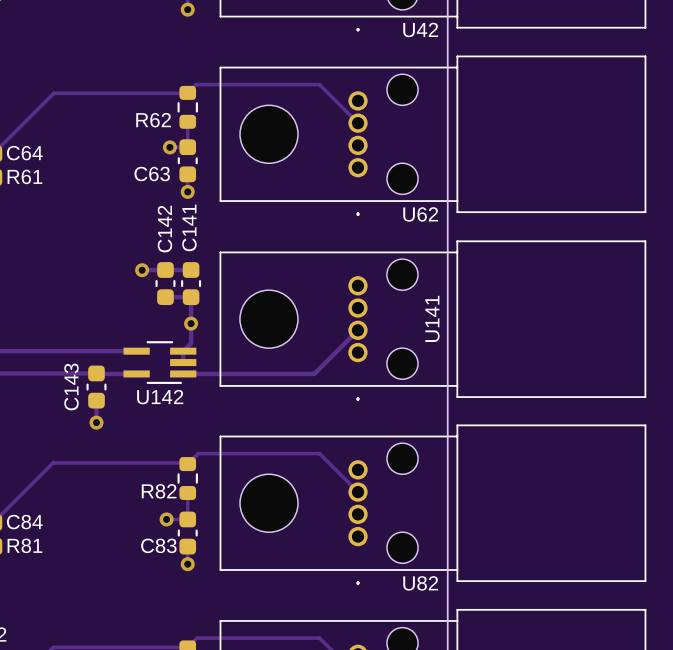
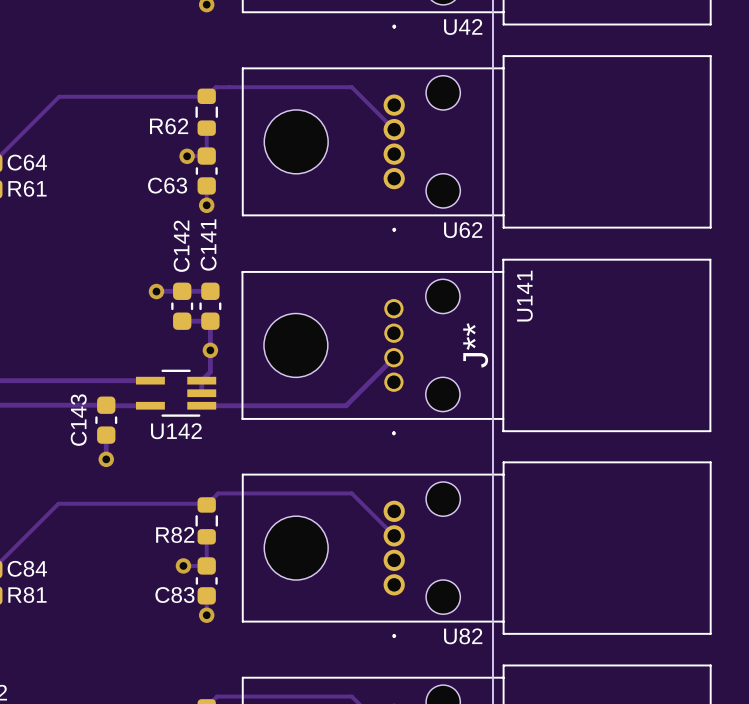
U141 footprint: [219, 240, 647, 401] -> [241, 258, 712, 436]
U141 name position: U141 (432, 318) -> U141 (524, 296)

